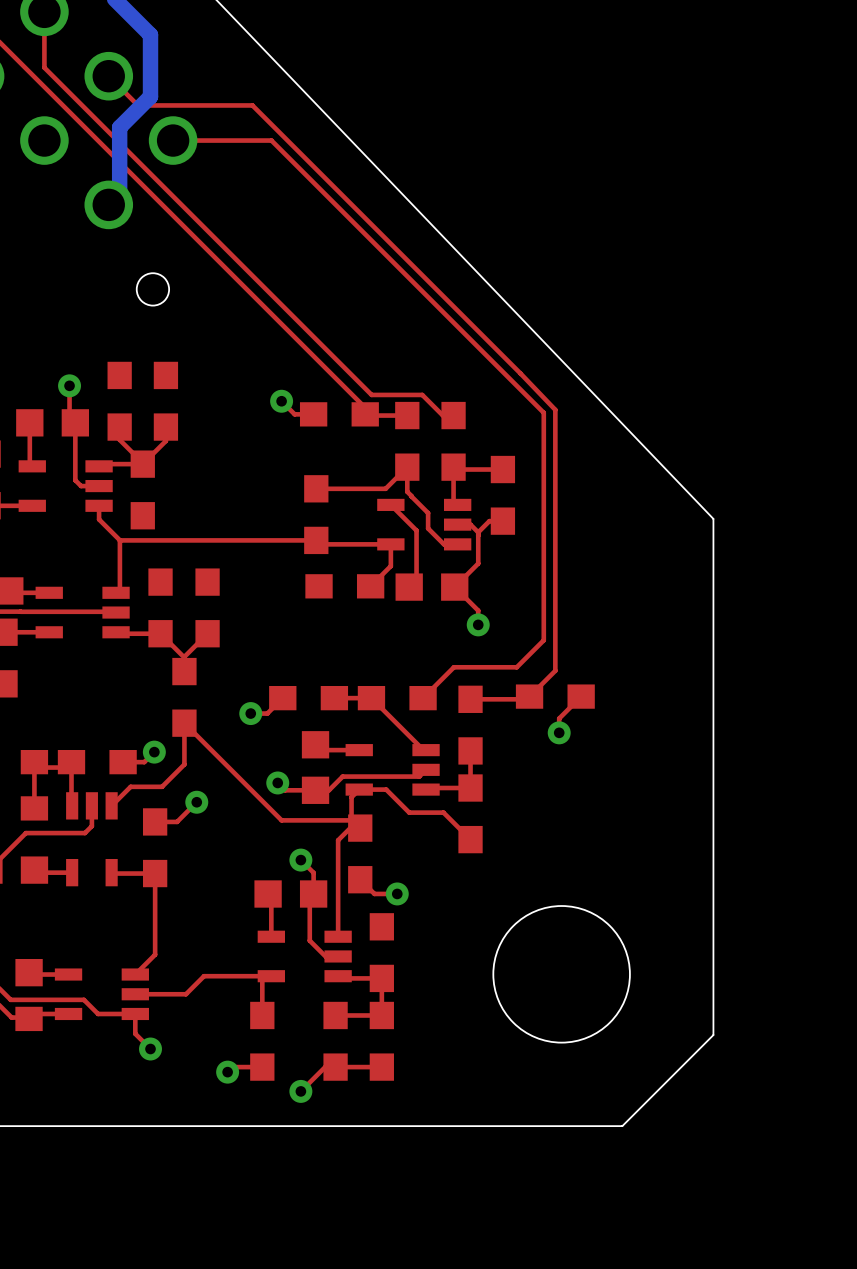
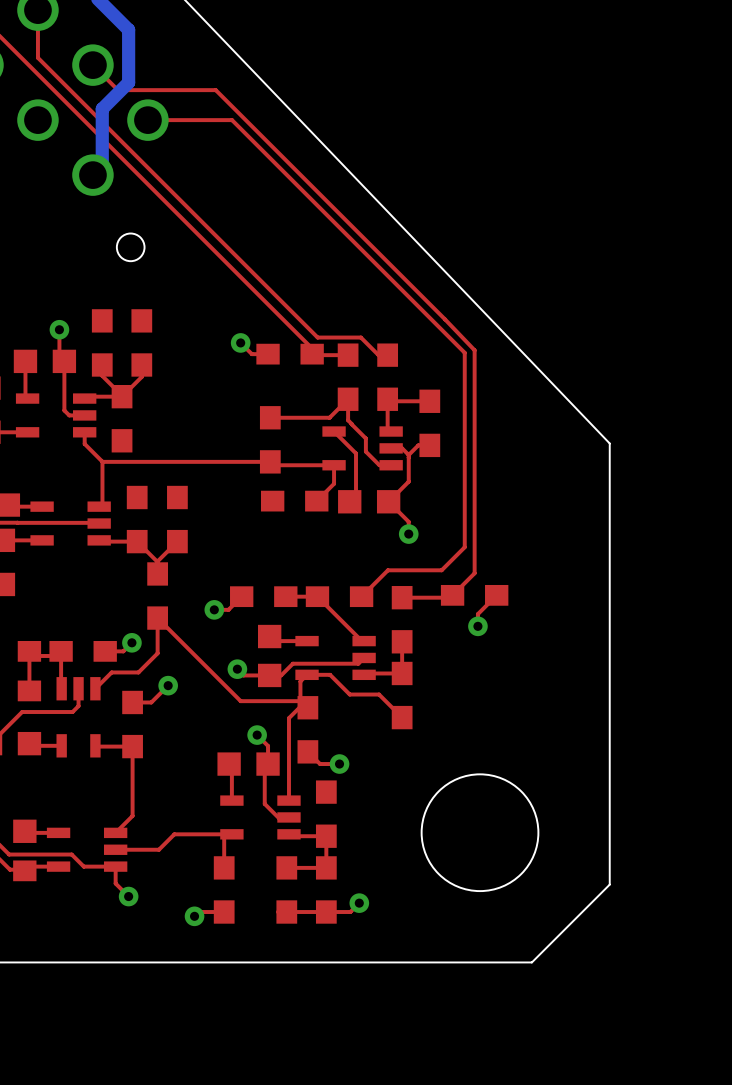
top track: none -> (359, 903) (350, 912) (326, 912)
top track: (325, 1067) (300, 1091) -> none
via position: (300, 1091) -> (359, 903)

